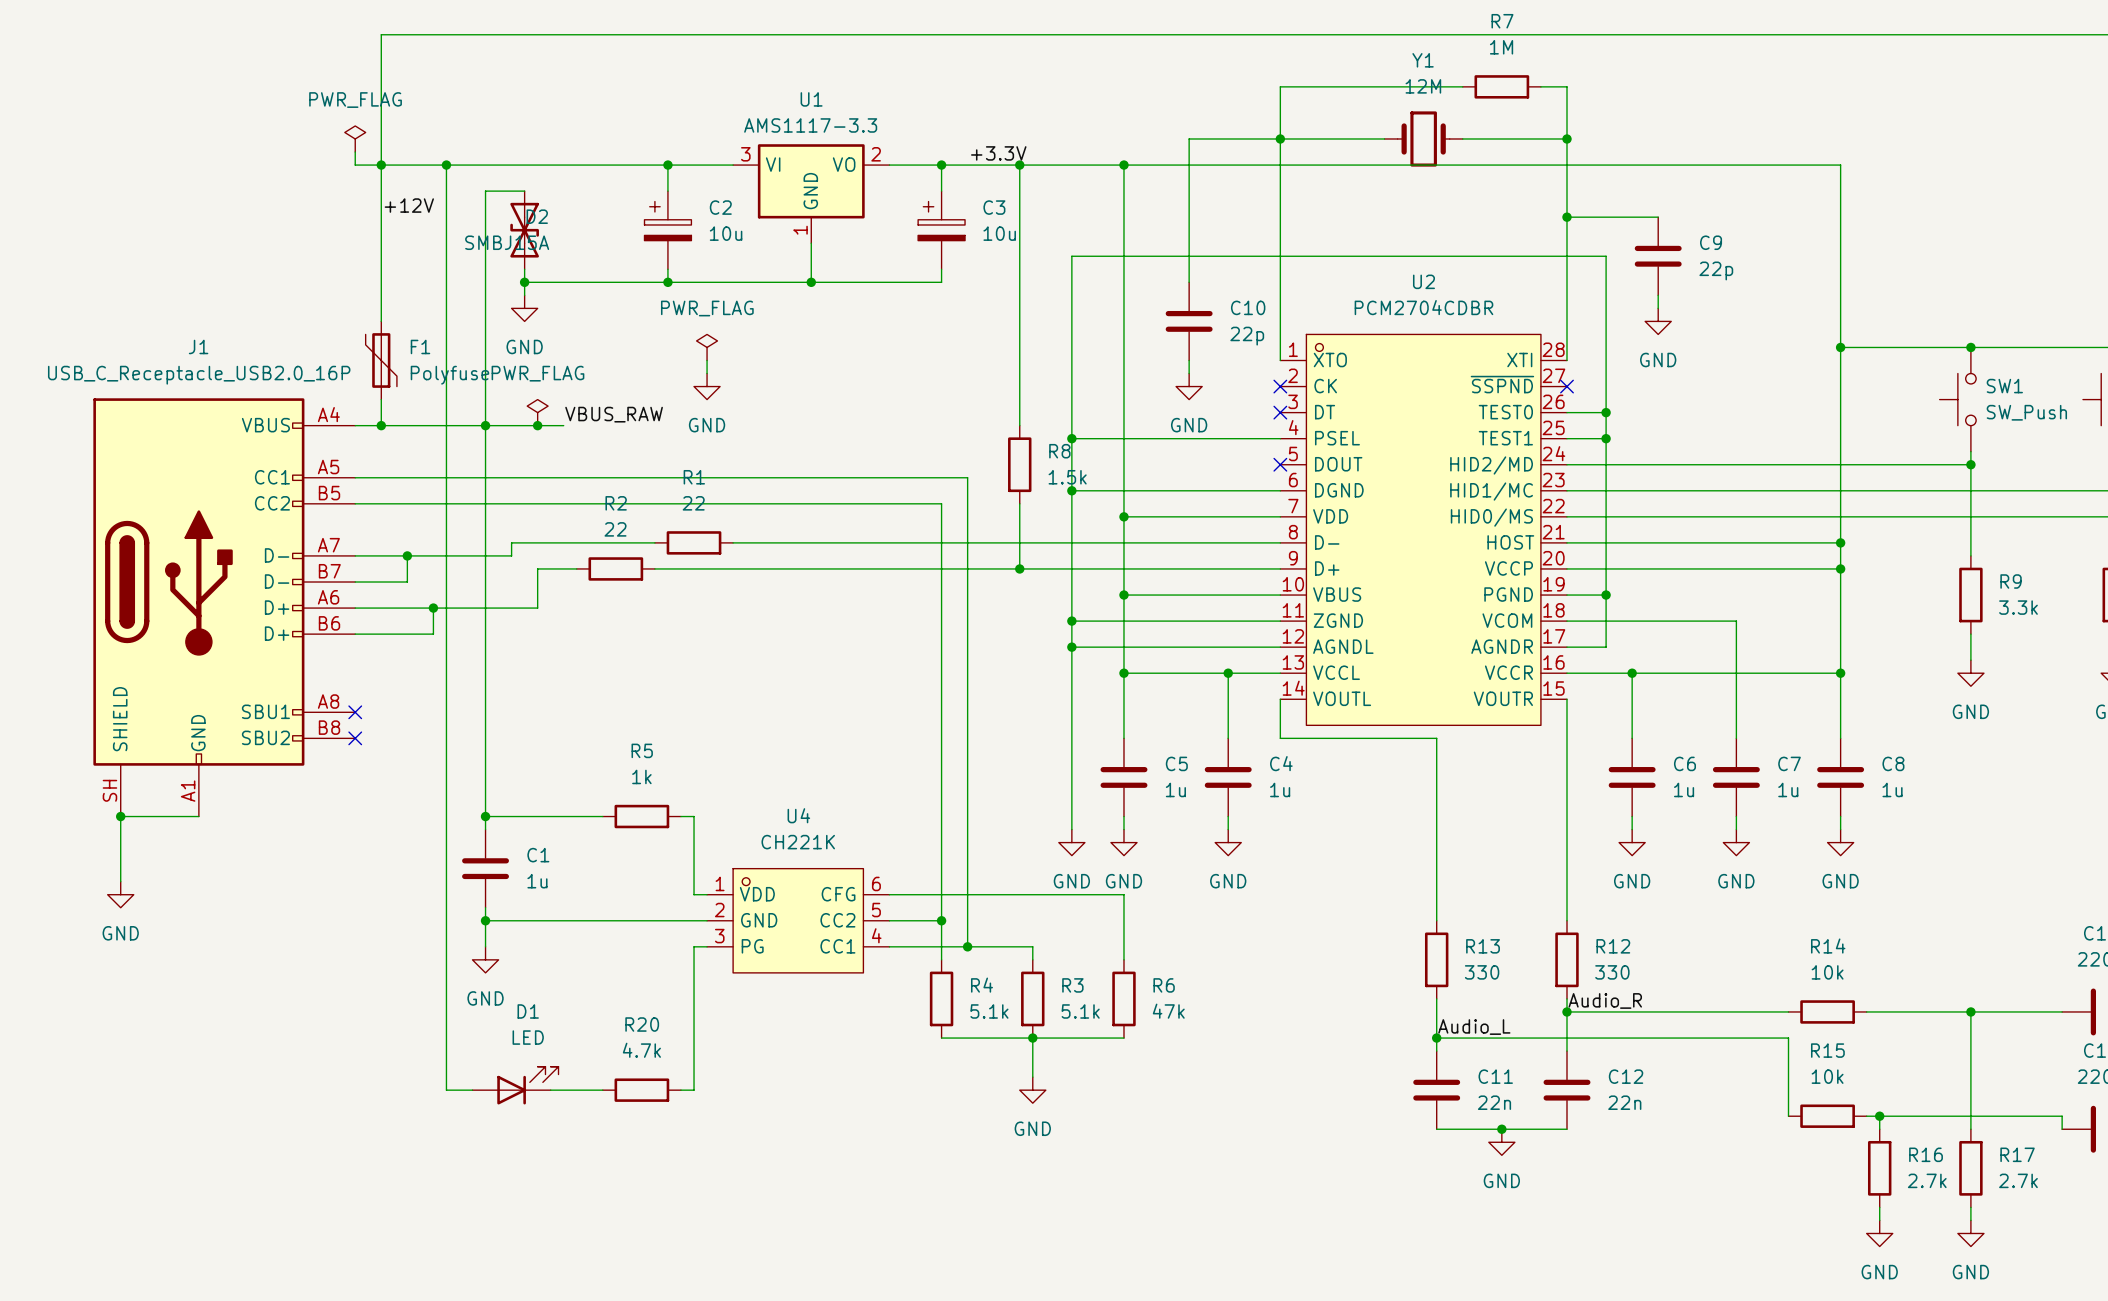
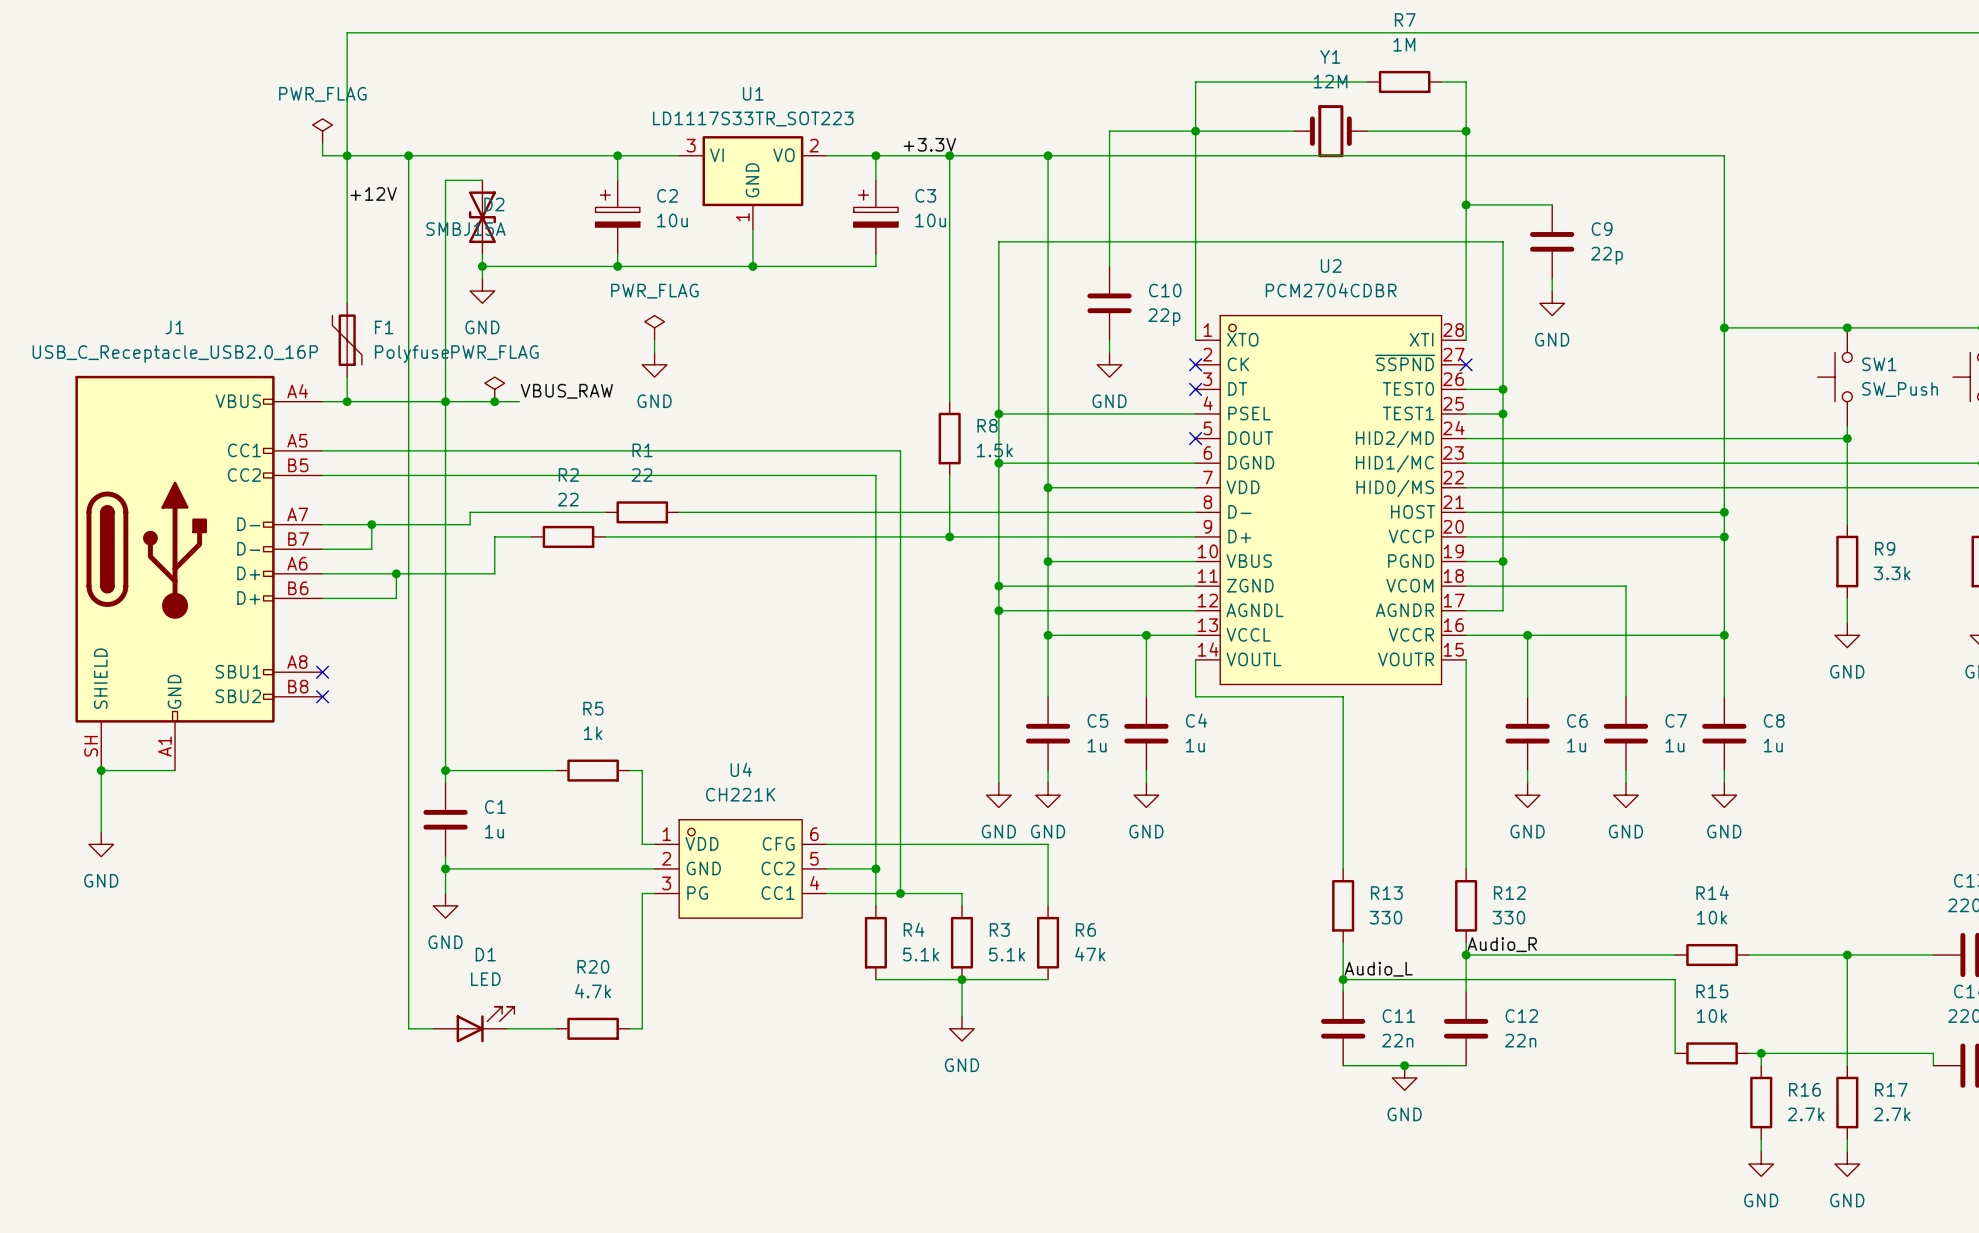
U1 value: AMS1117-3.3 (810, 125) -> LD1117S33TR_SOT223 (753, 119)

